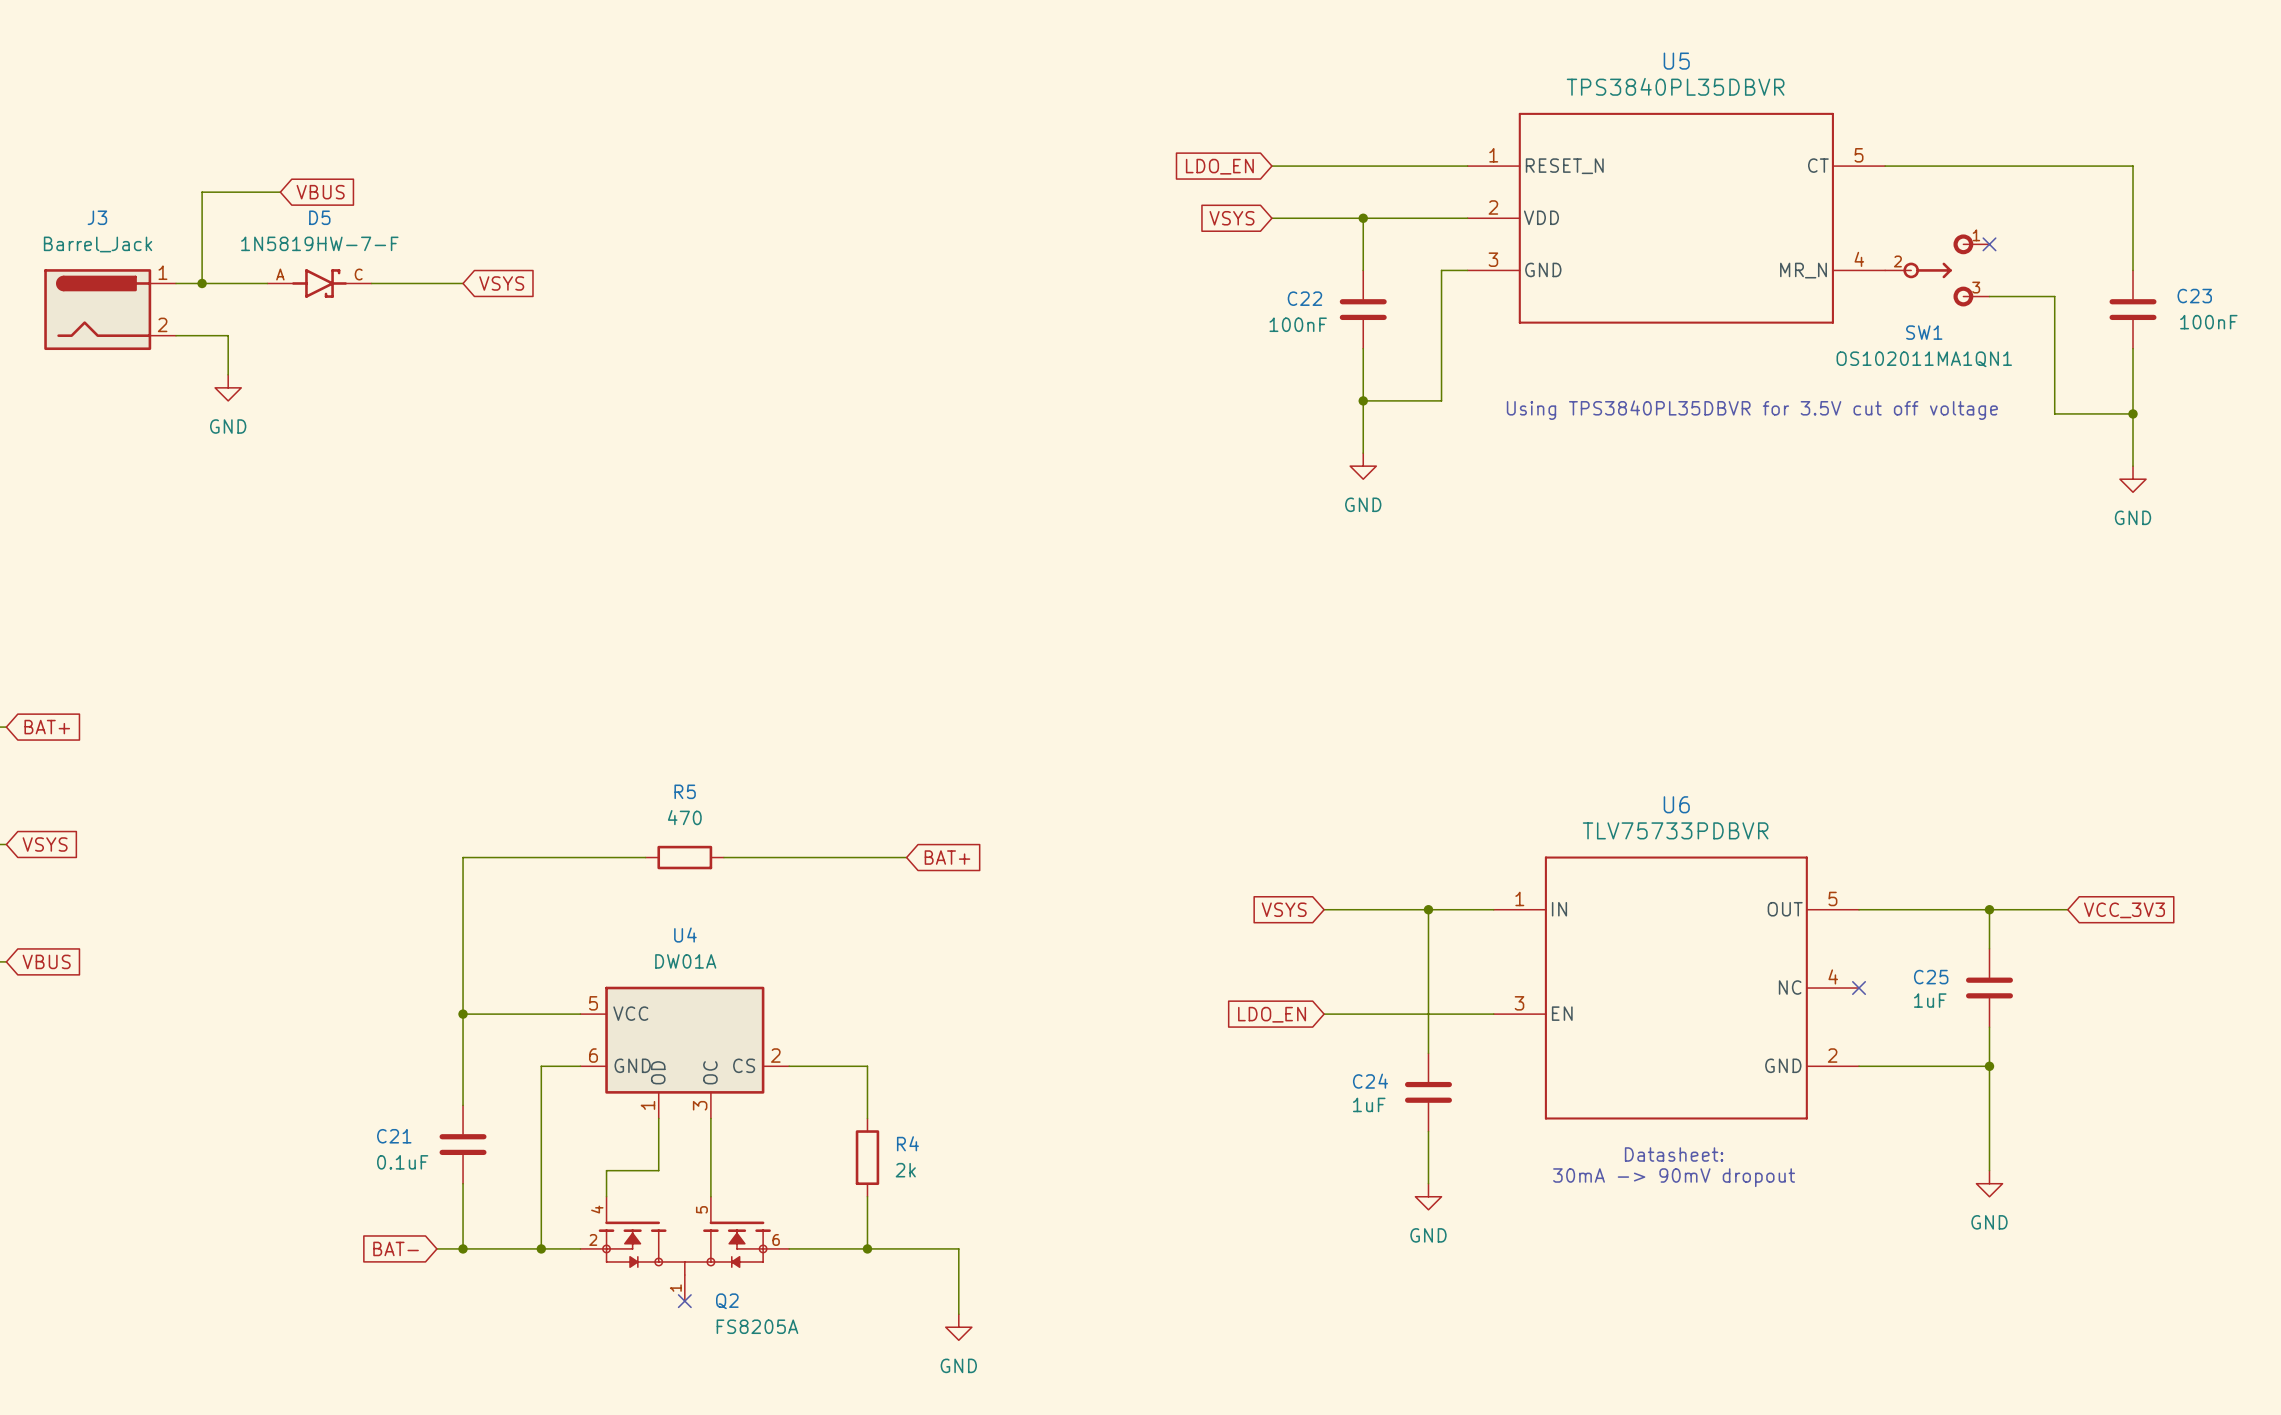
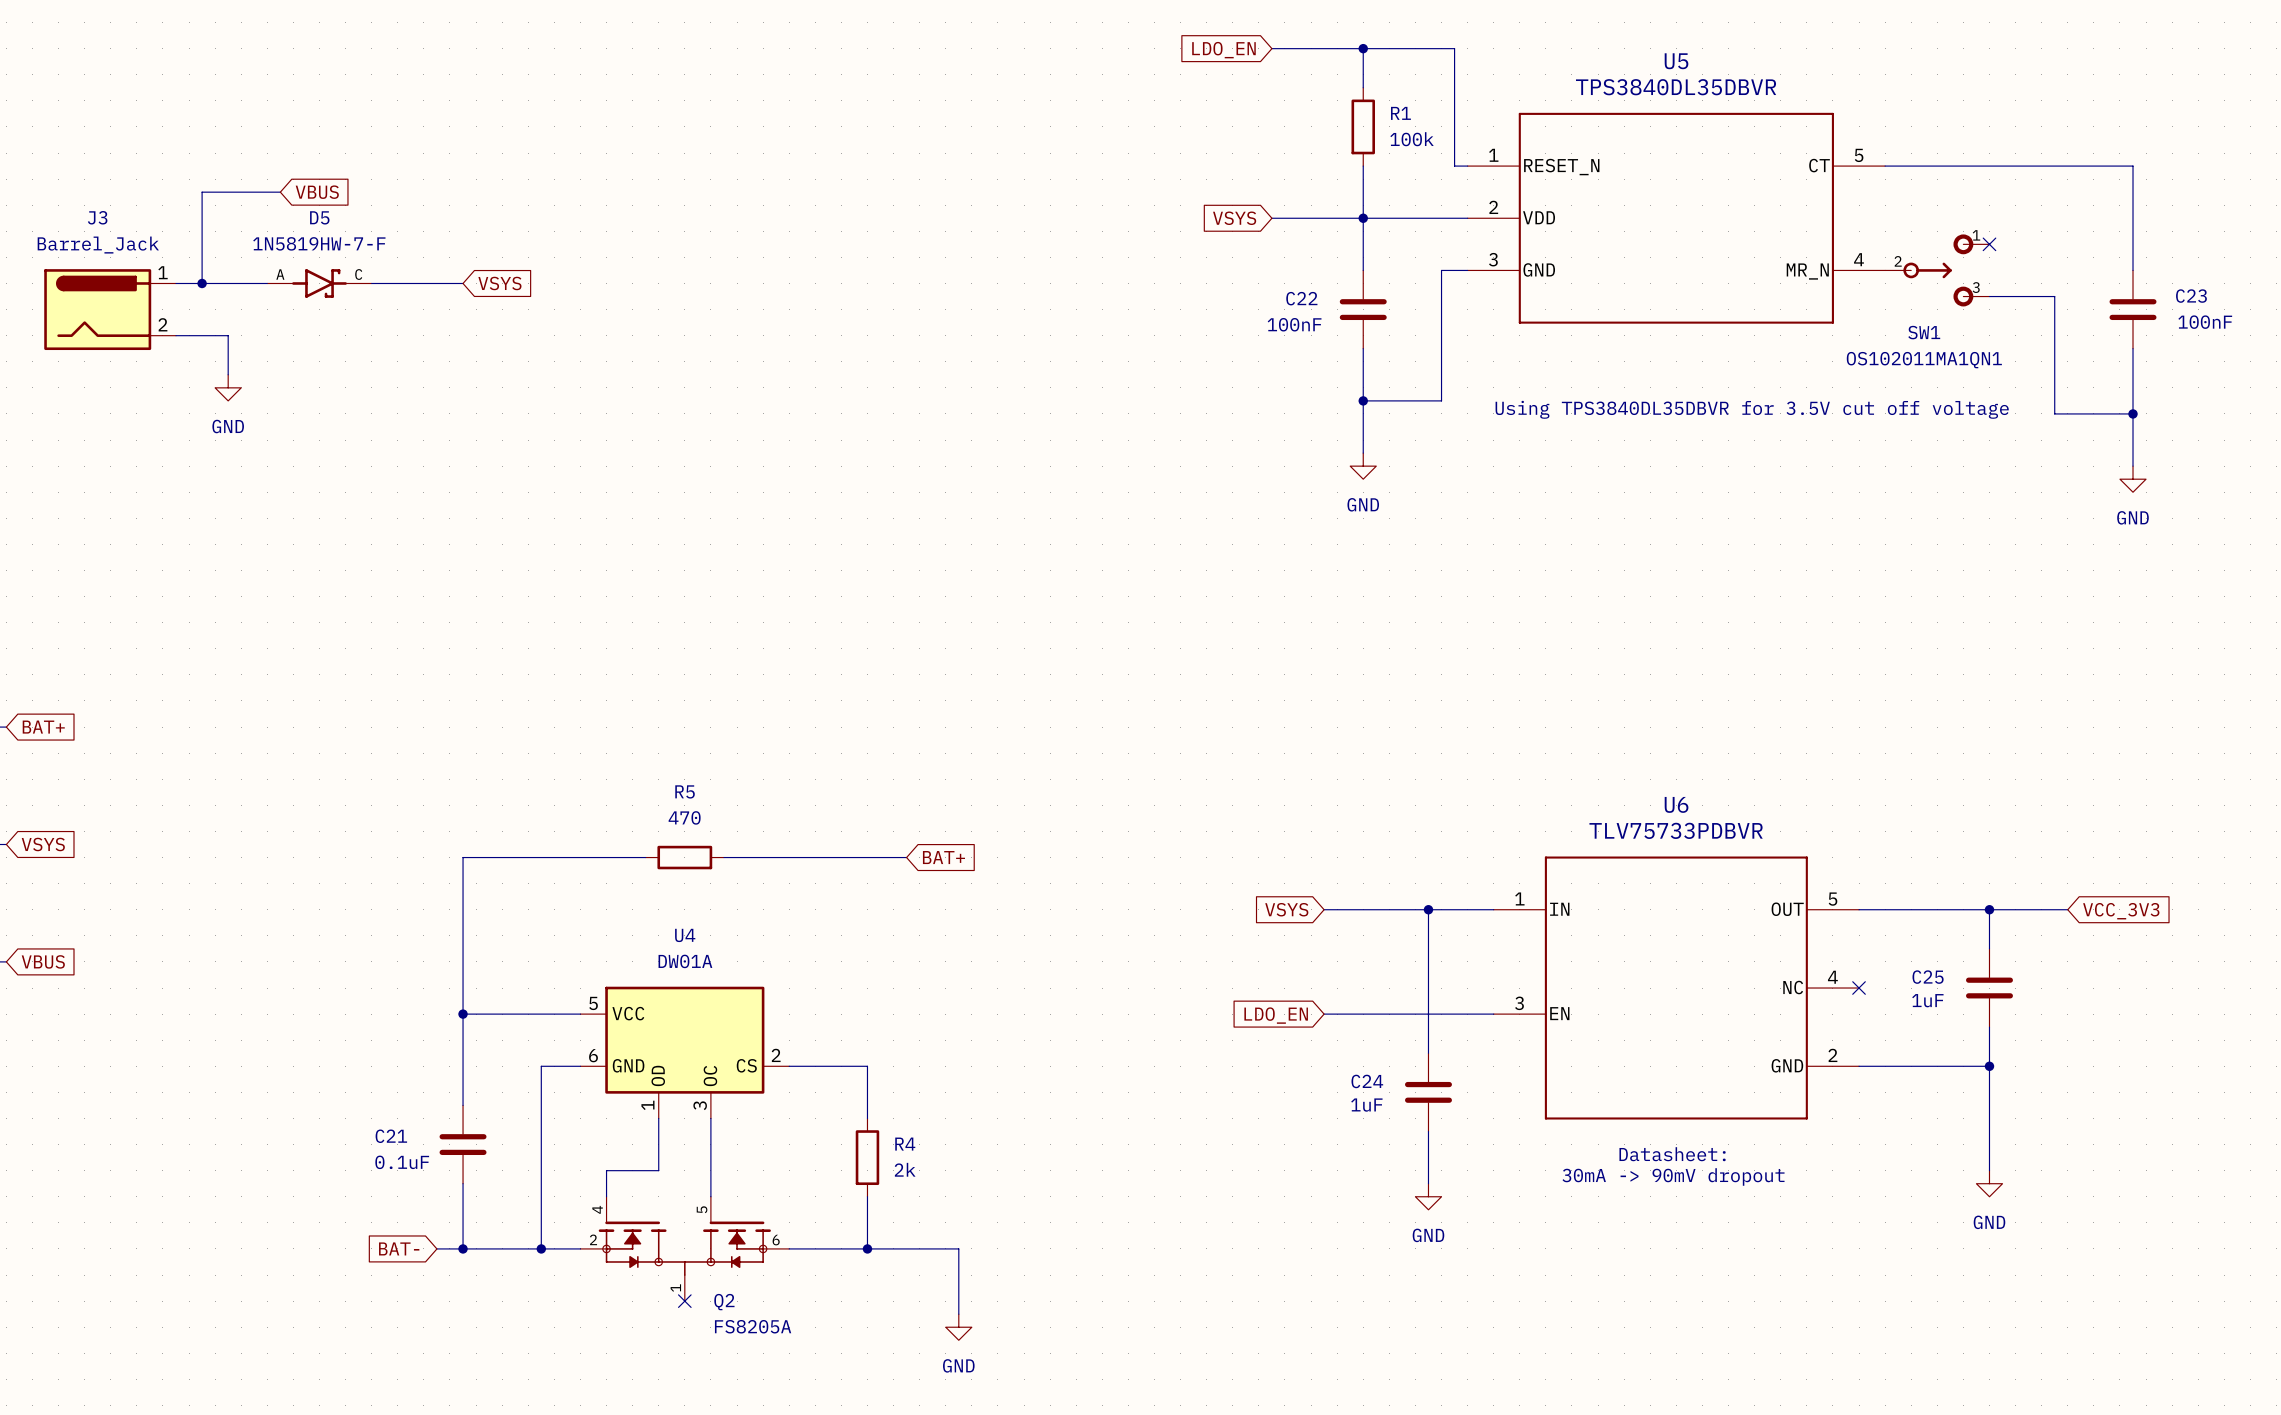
wire: none -> (1363, 48) (1363, 87)
junction: none -> (1363, 48)
U5 value: TPS3840PL35DBVR (1675, 86) -> TPS3840DL35DBVR (1676, 87)
R1: none -> 100k (1363, 126)
global label position: LDO_EN (1219, 166) -> LDO_EN (1223, 50)
wire: (1271, 166) (1454, 166) -> (1271, 48) (1454, 48) (1454, 166)
wire: none -> (1363, 166) (1363, 218)
text: Using TPS3840PL35DBVR for 3.5V cut off voltage (1752, 410) -> Using TPS3840DL35DBVR for 3.5V cut off voltage (1752, 409)

